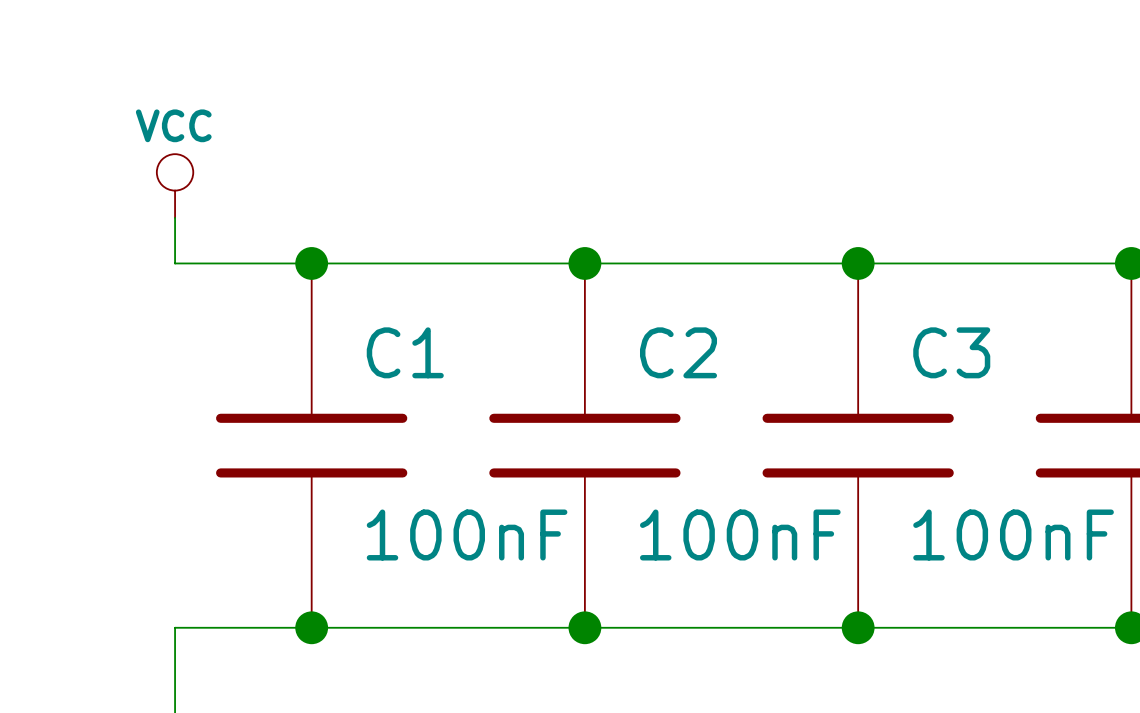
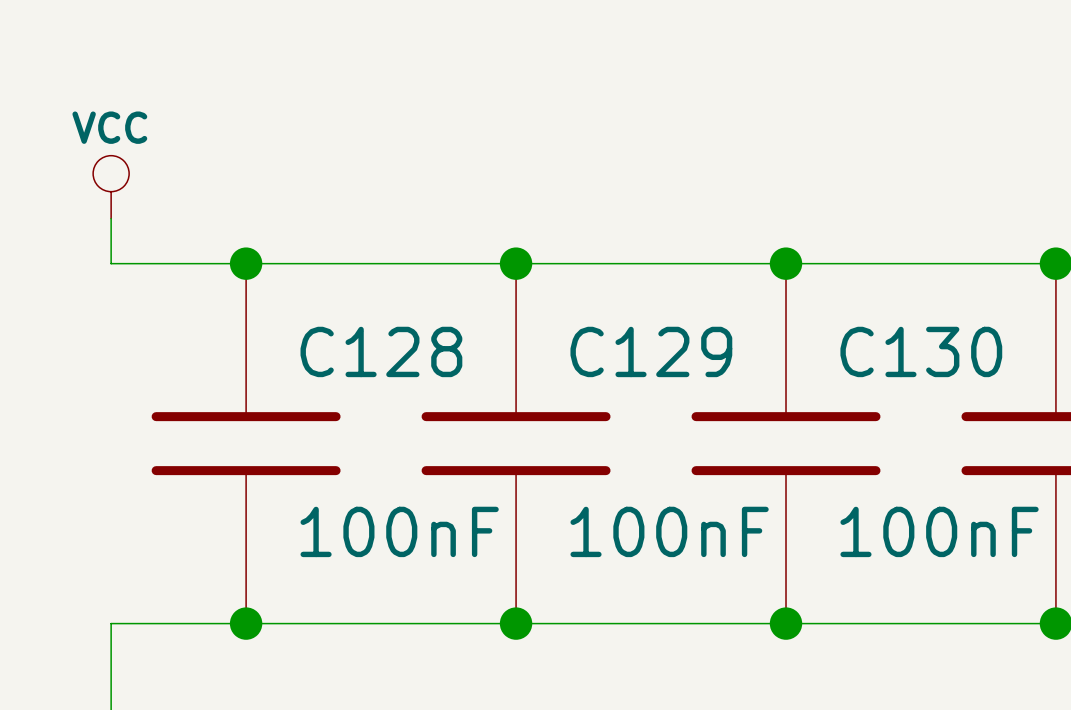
C1 name: C1 (405, 352) -> C128 (381, 351)
C2 name: C2 (678, 352) -> C129 (651, 351)
C3 name: C3 (951, 352) -> C130 (921, 351)

